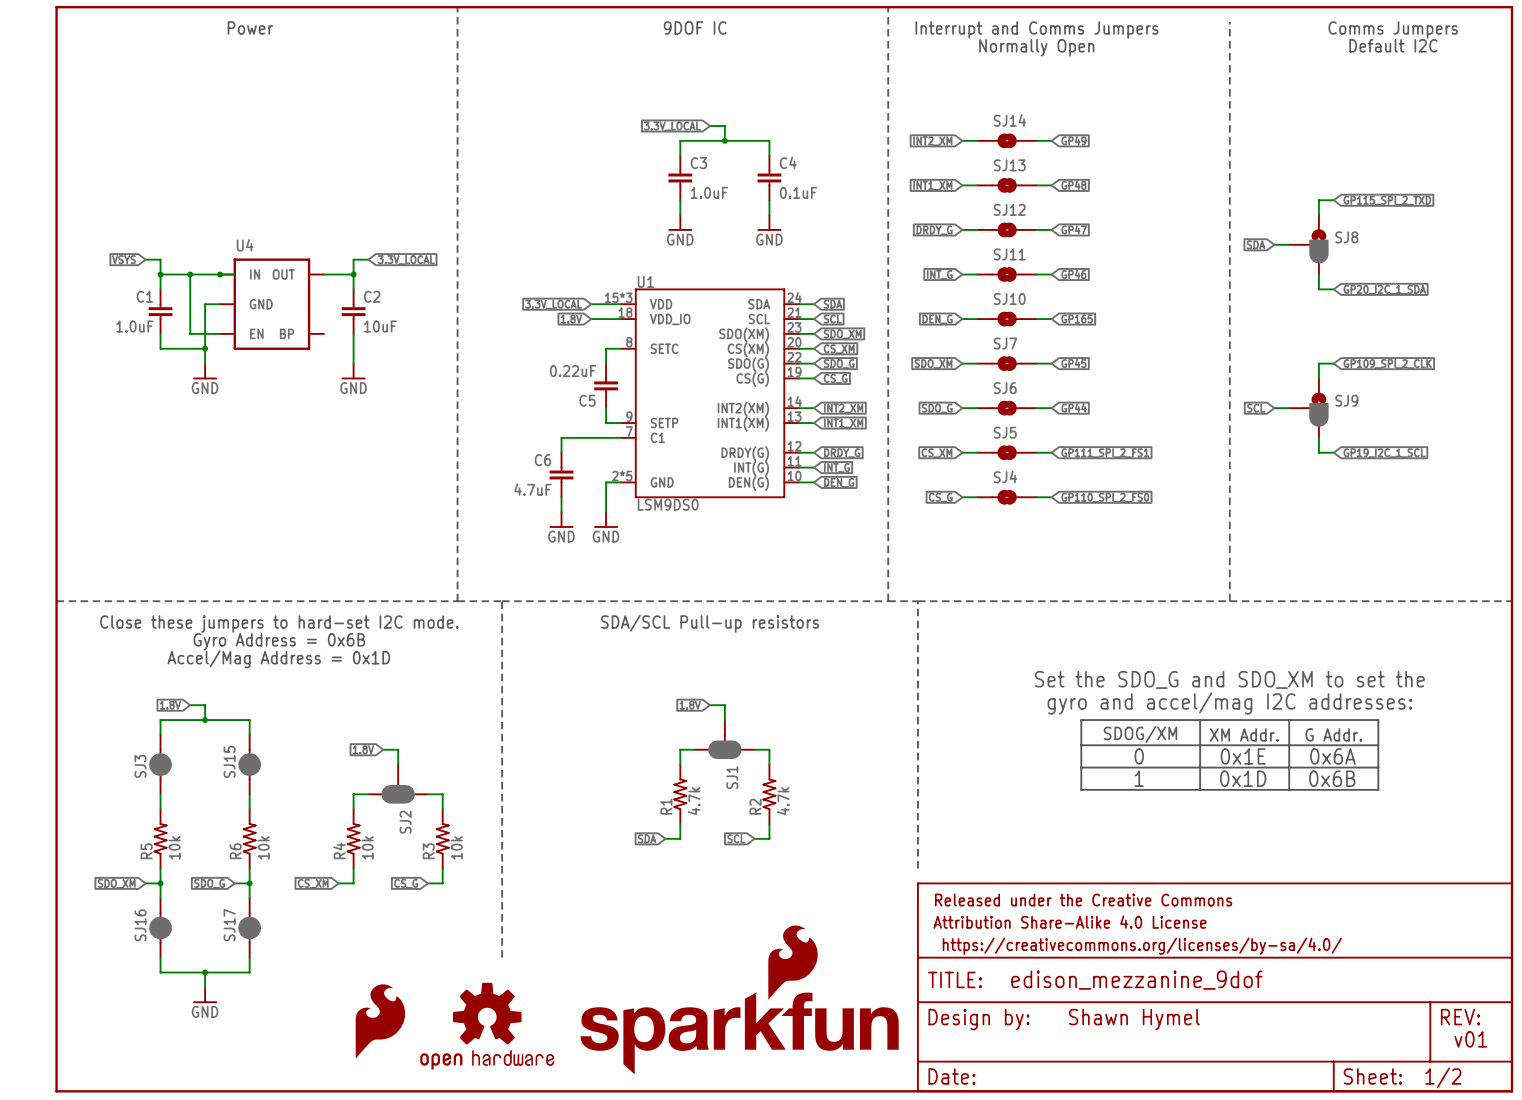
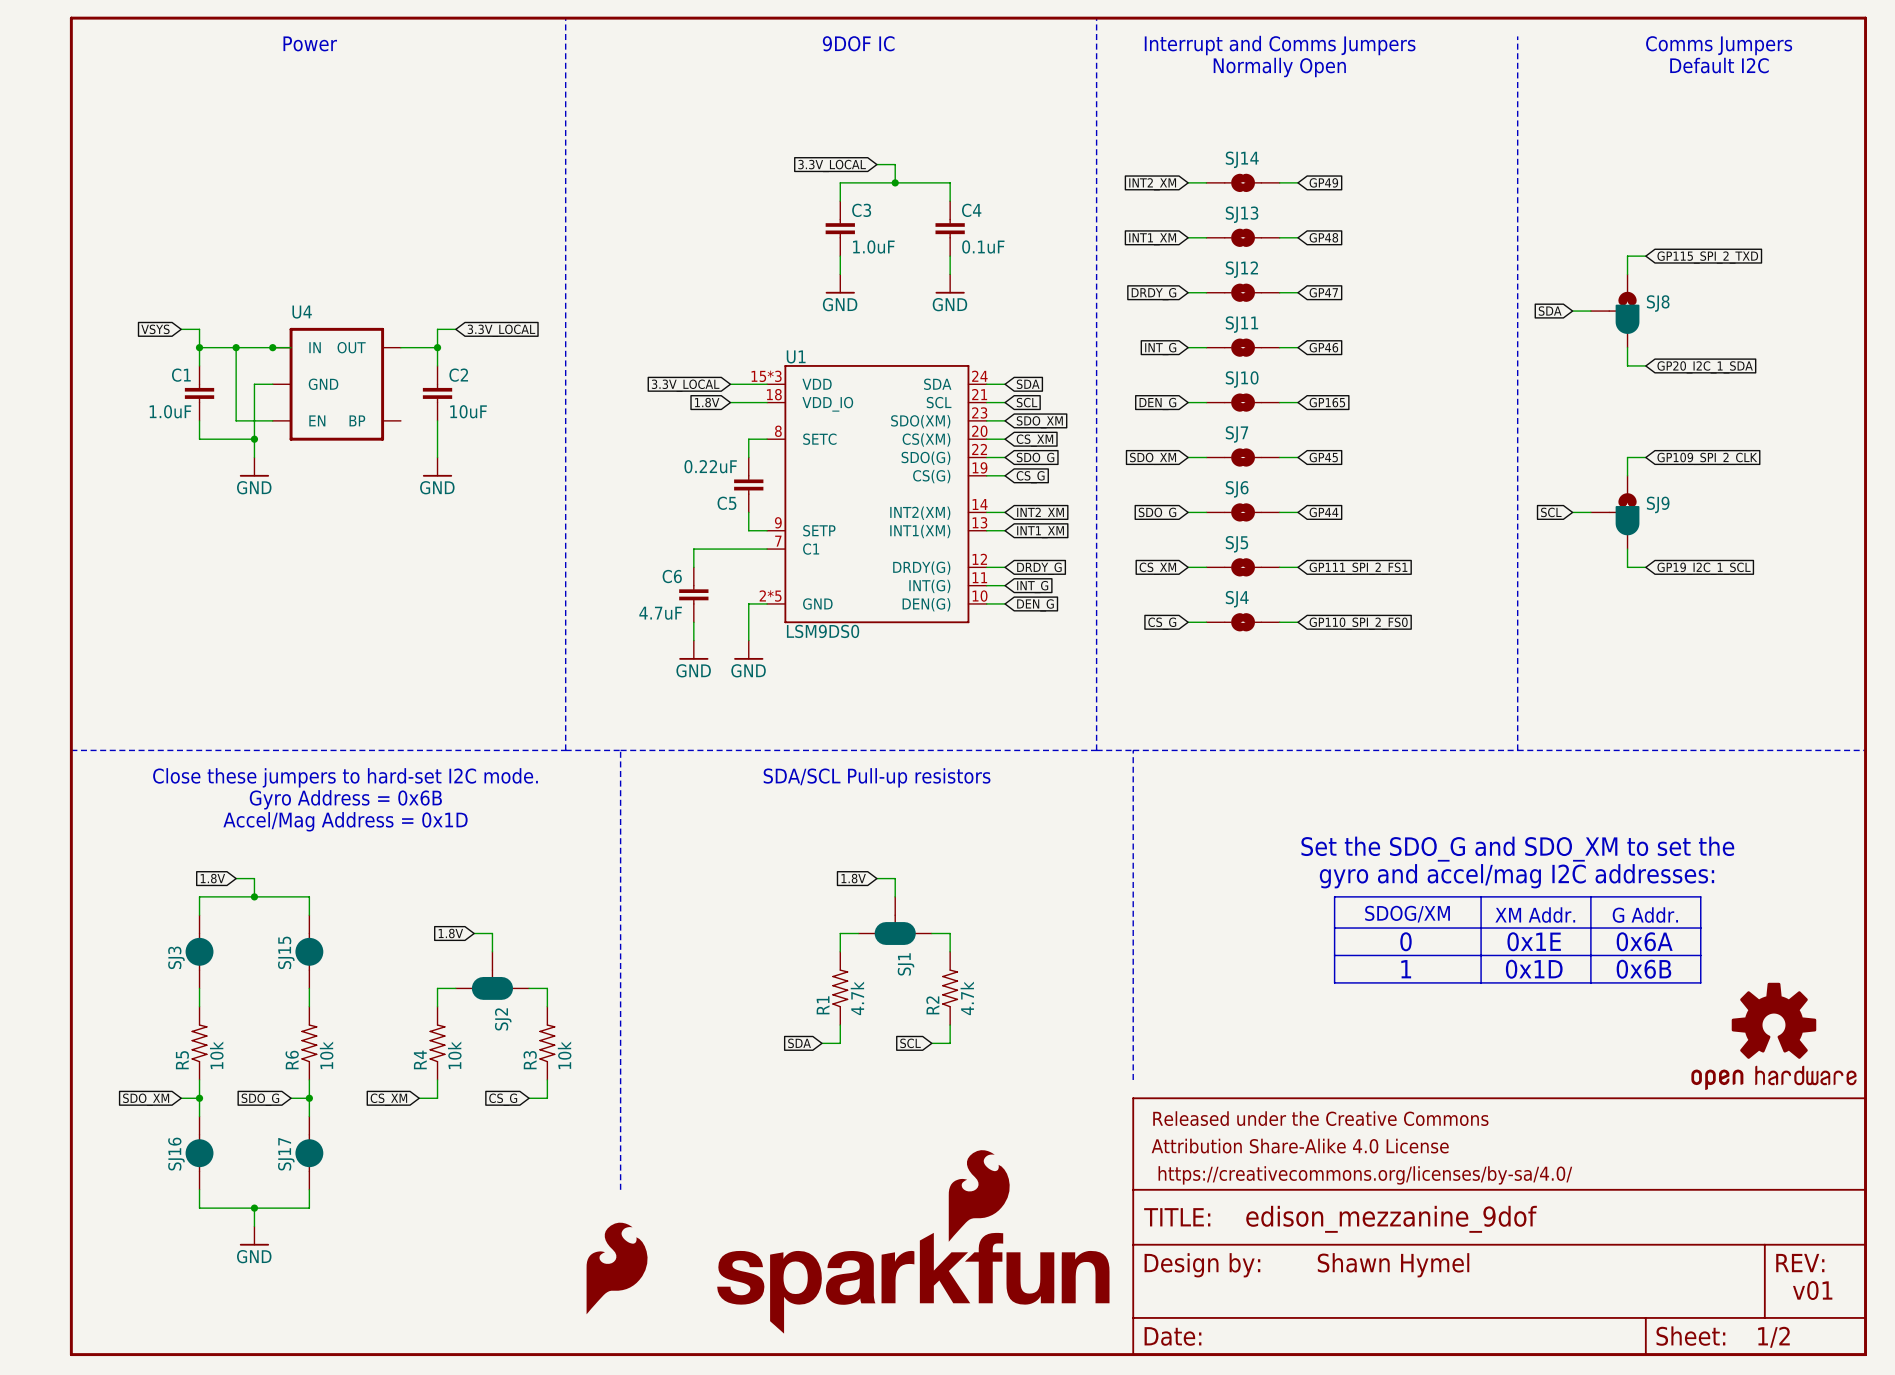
part: none -> (1773, 1036)
part position: (380, 1021) -> (617, 1268)
part: (487, 1026) -> none

